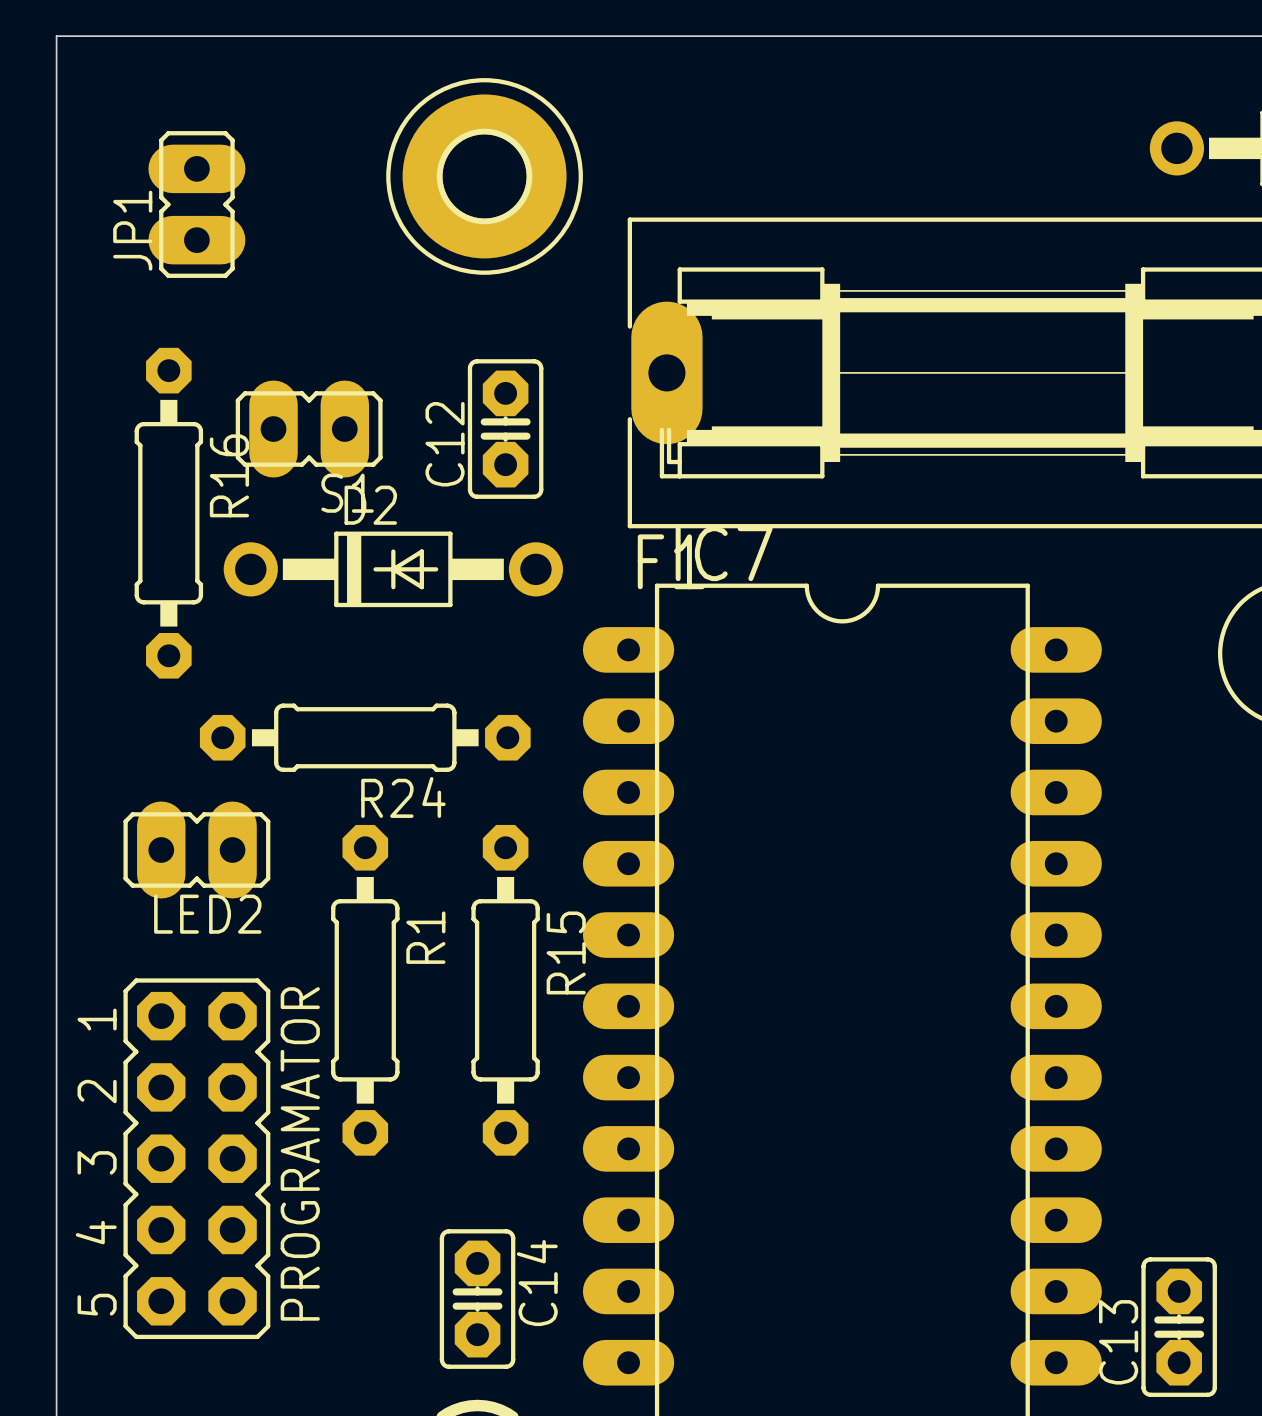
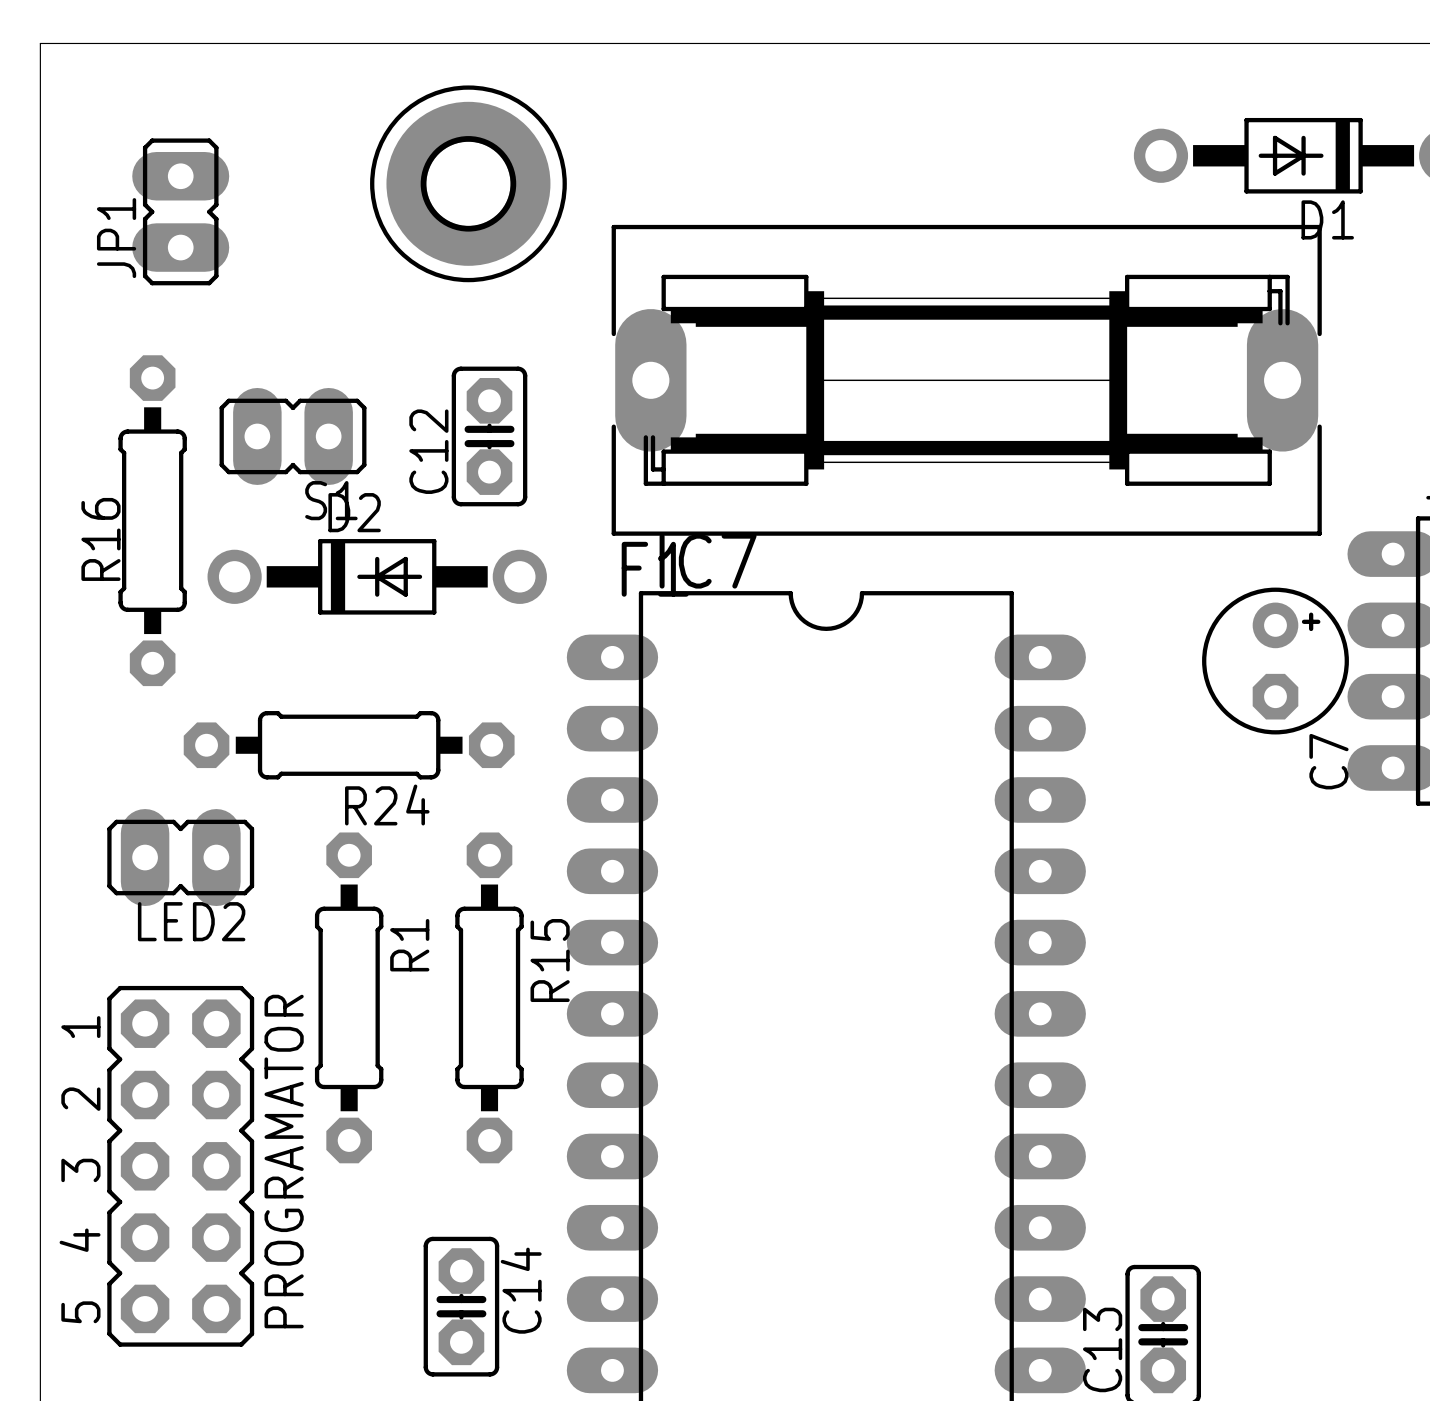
R16 name position: R16 (229, 475) -> R16 (100, 539)

